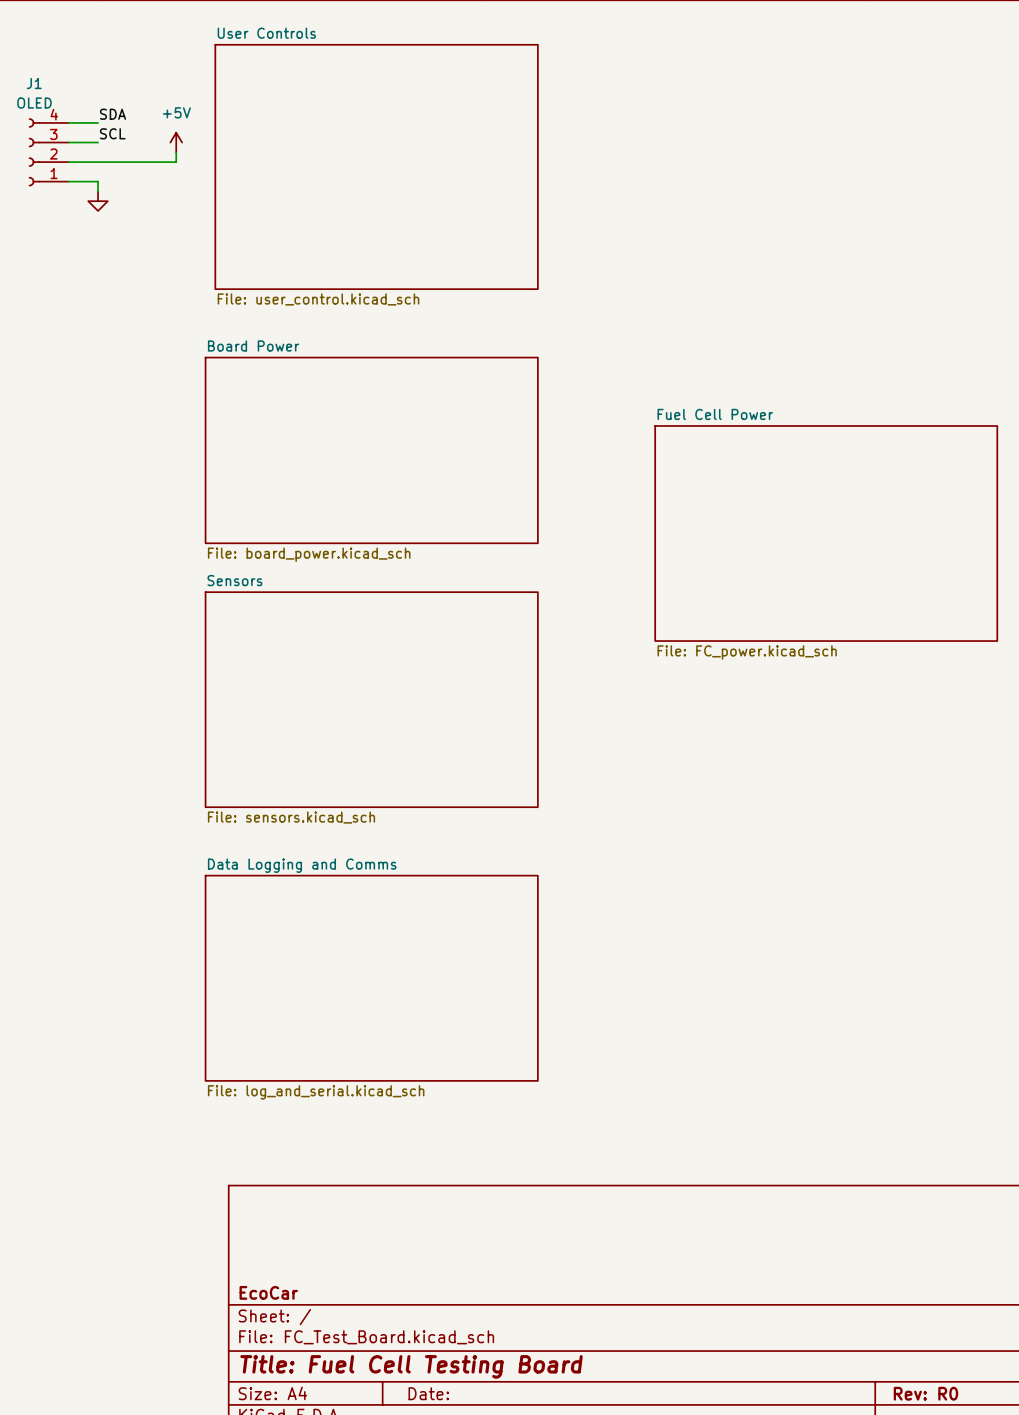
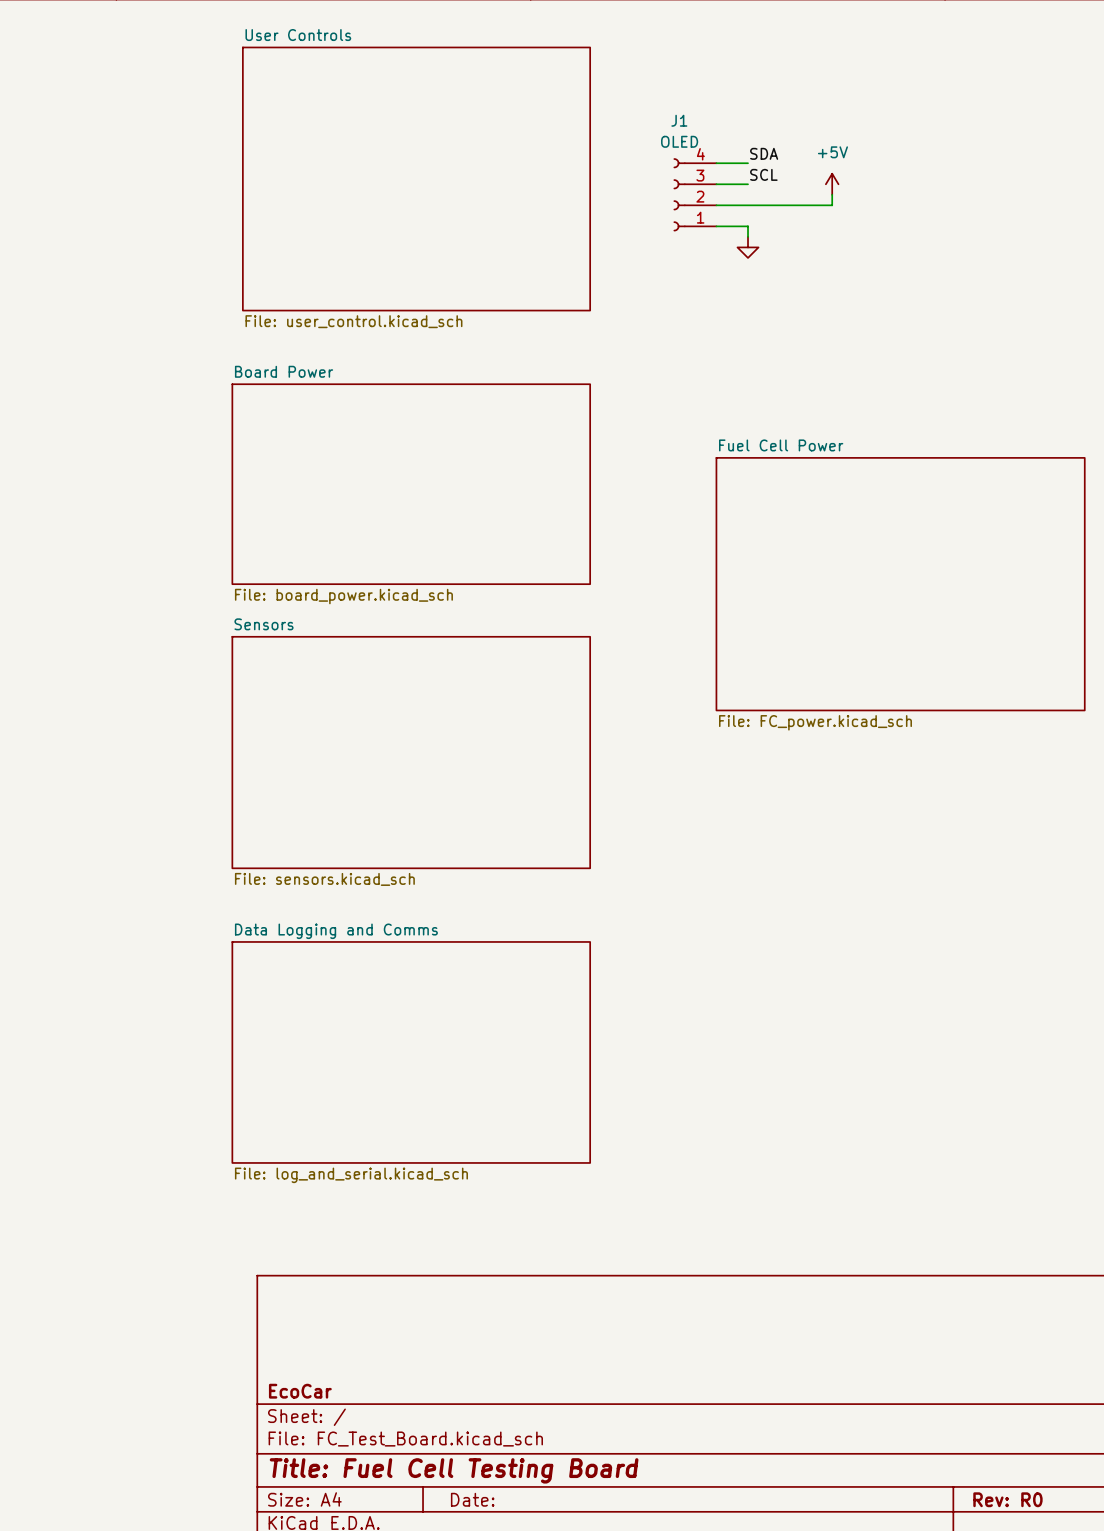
label: SDA (113, 114) -> none
wire: (68, 122) (98, 122) -> none
label: SCL (112, 133) -> none
wire: (68, 142) (98, 142) -> none
power symbol: +5V (176, 142) -> none
label: none -> SDA (764, 153)
J1 position: (48, 152) -> (695, 194)
wire: (176, 152) (176, 162) (68, 162) -> none
wire: none -> (716, 163) (748, 163)
label: none -> SCL (763, 174)
wire: none -> (716, 184) (748, 184)
power symbol: none -> +5V (832, 184)
wire: (68, 181) (98, 181) (98, 191) -> none
wire: none -> (832, 194) (832, 205) (716, 205)
power symbol: (98, 201) -> none
wire: none -> (716, 226) (748, 226) (748, 236)
power symbol: none -> (748, 247)
sheet Fuel Cell Power: File: FC_power.kicad_sch (826, 533) -> none
sheet Fuel Cell Power: none -> File: FC_power.kicad_sch (900, 584)

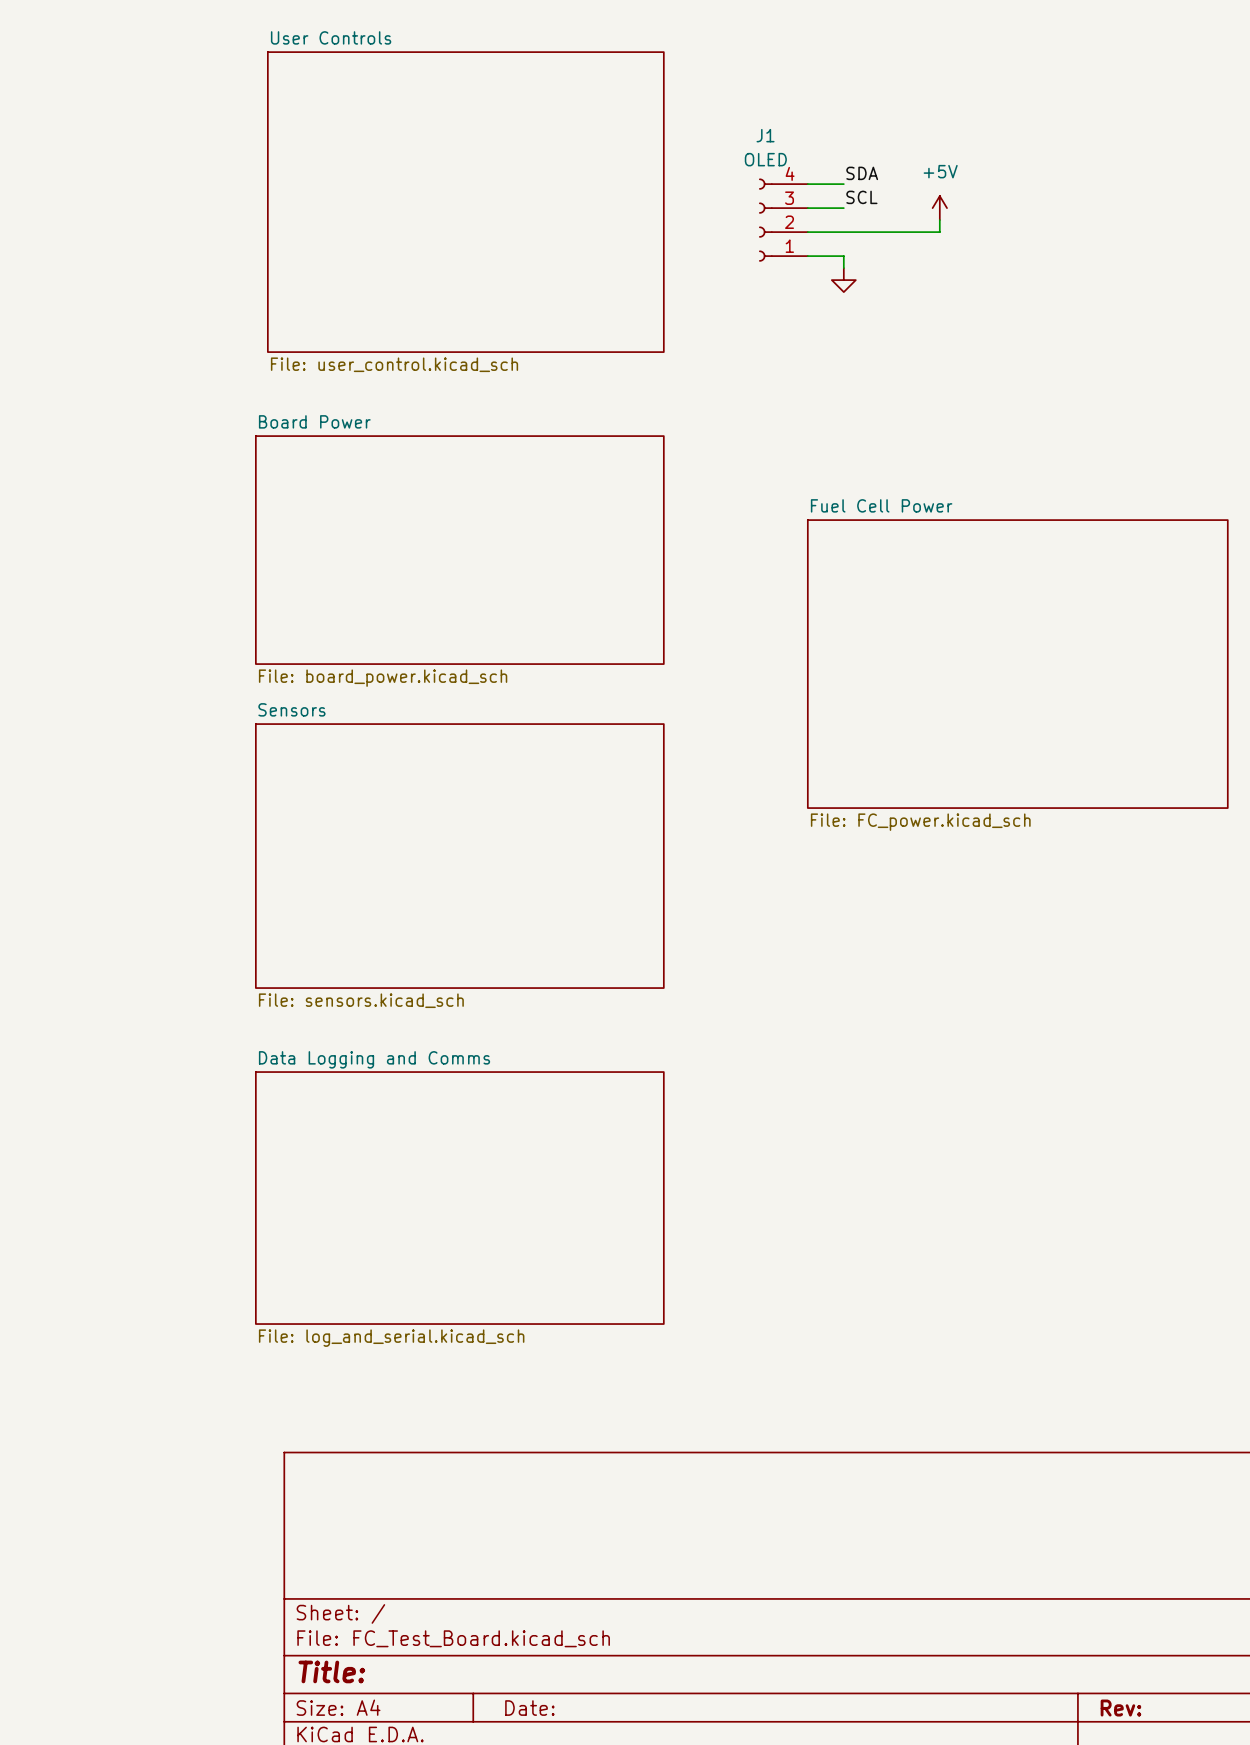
title block: EcoCar (300, 1391) -> none
title block: Title: Fuel Cell Testing Board (454, 1470) -> Title: (331, 1671)
title block: Rev: R0 (1007, 1499) -> Rev: (1120, 1708)

